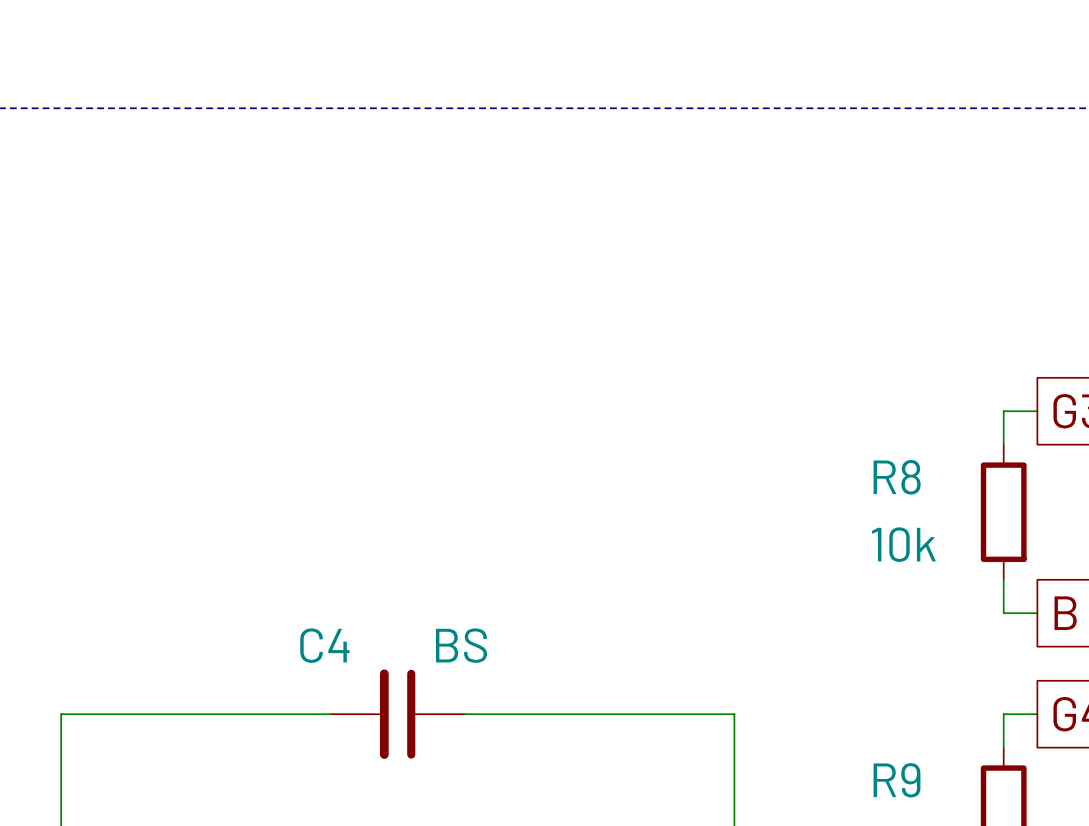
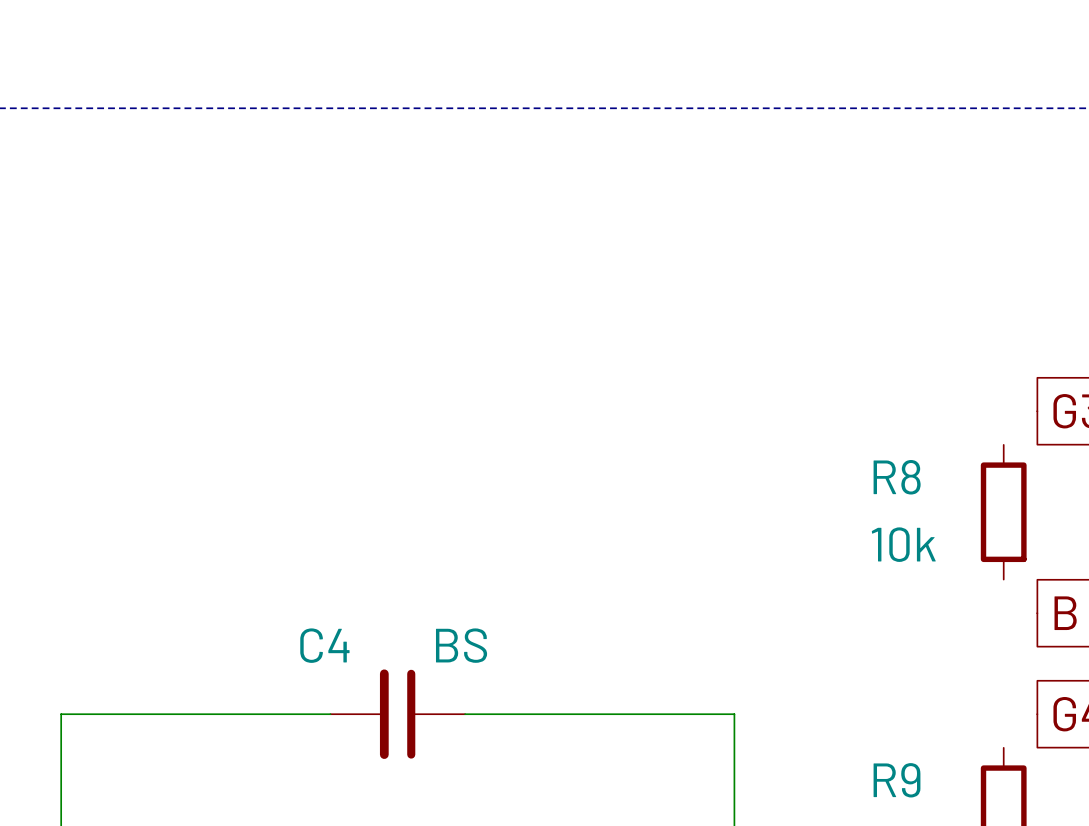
wire: (1037, 411) (1003, 411) (1003, 444) -> none
wire: (1003, 579) (1003, 613) (1037, 613) -> none
wire: (1037, 714) (1003, 714) (1003, 747) -> none

